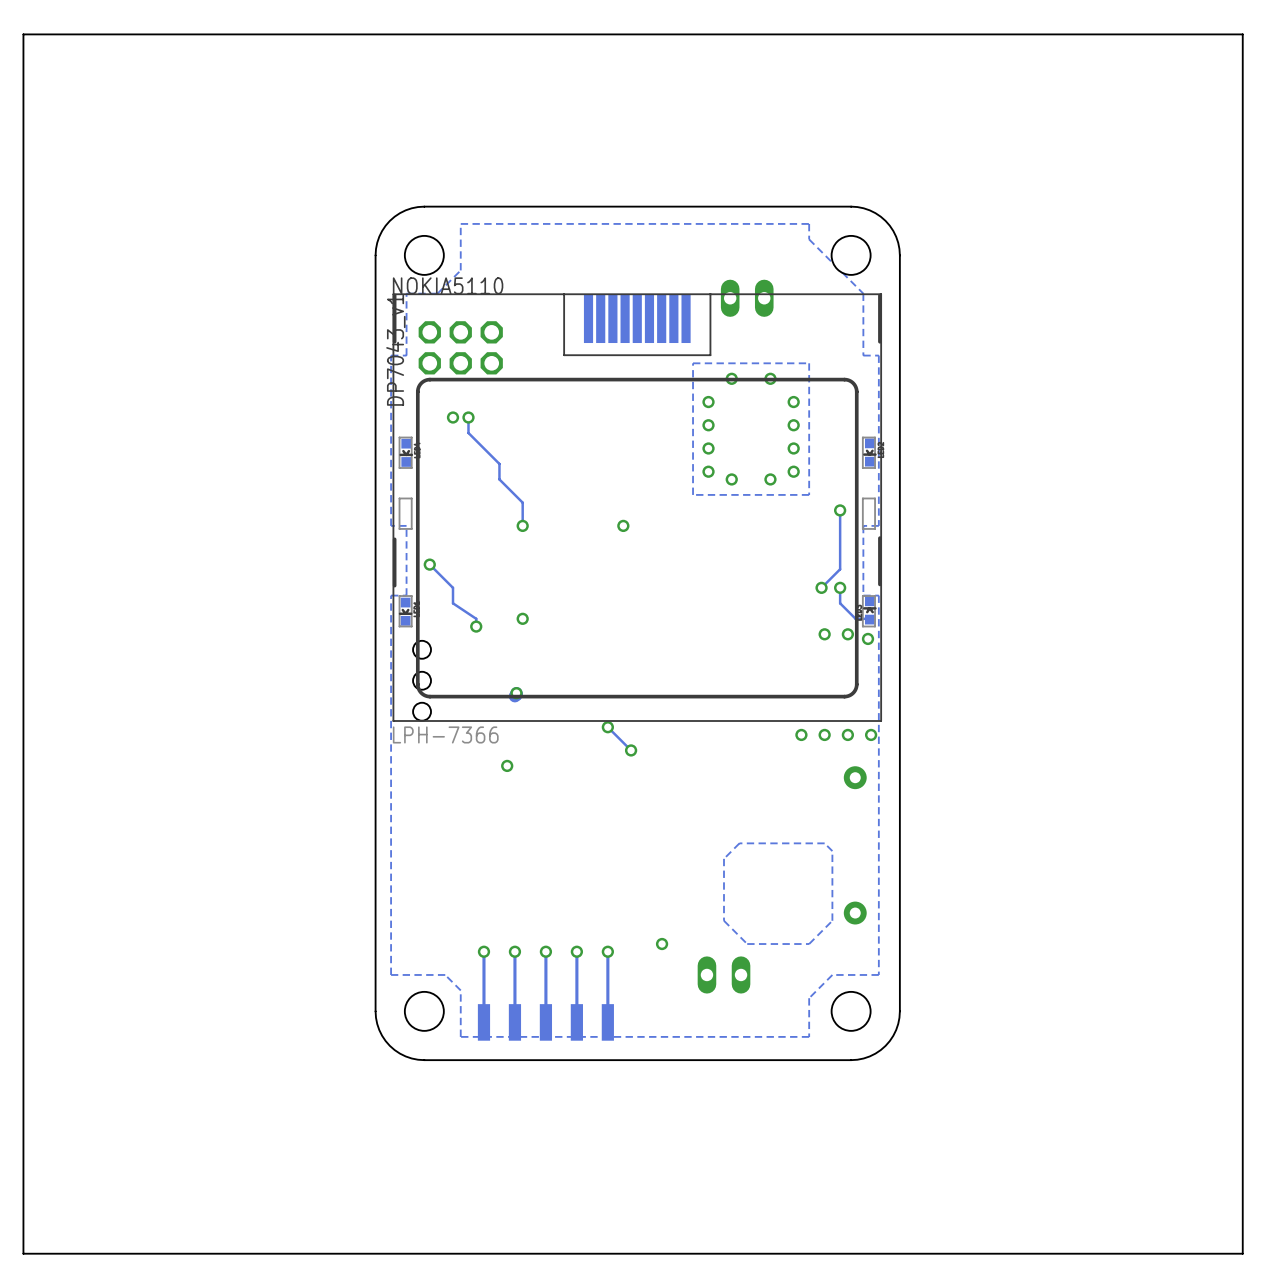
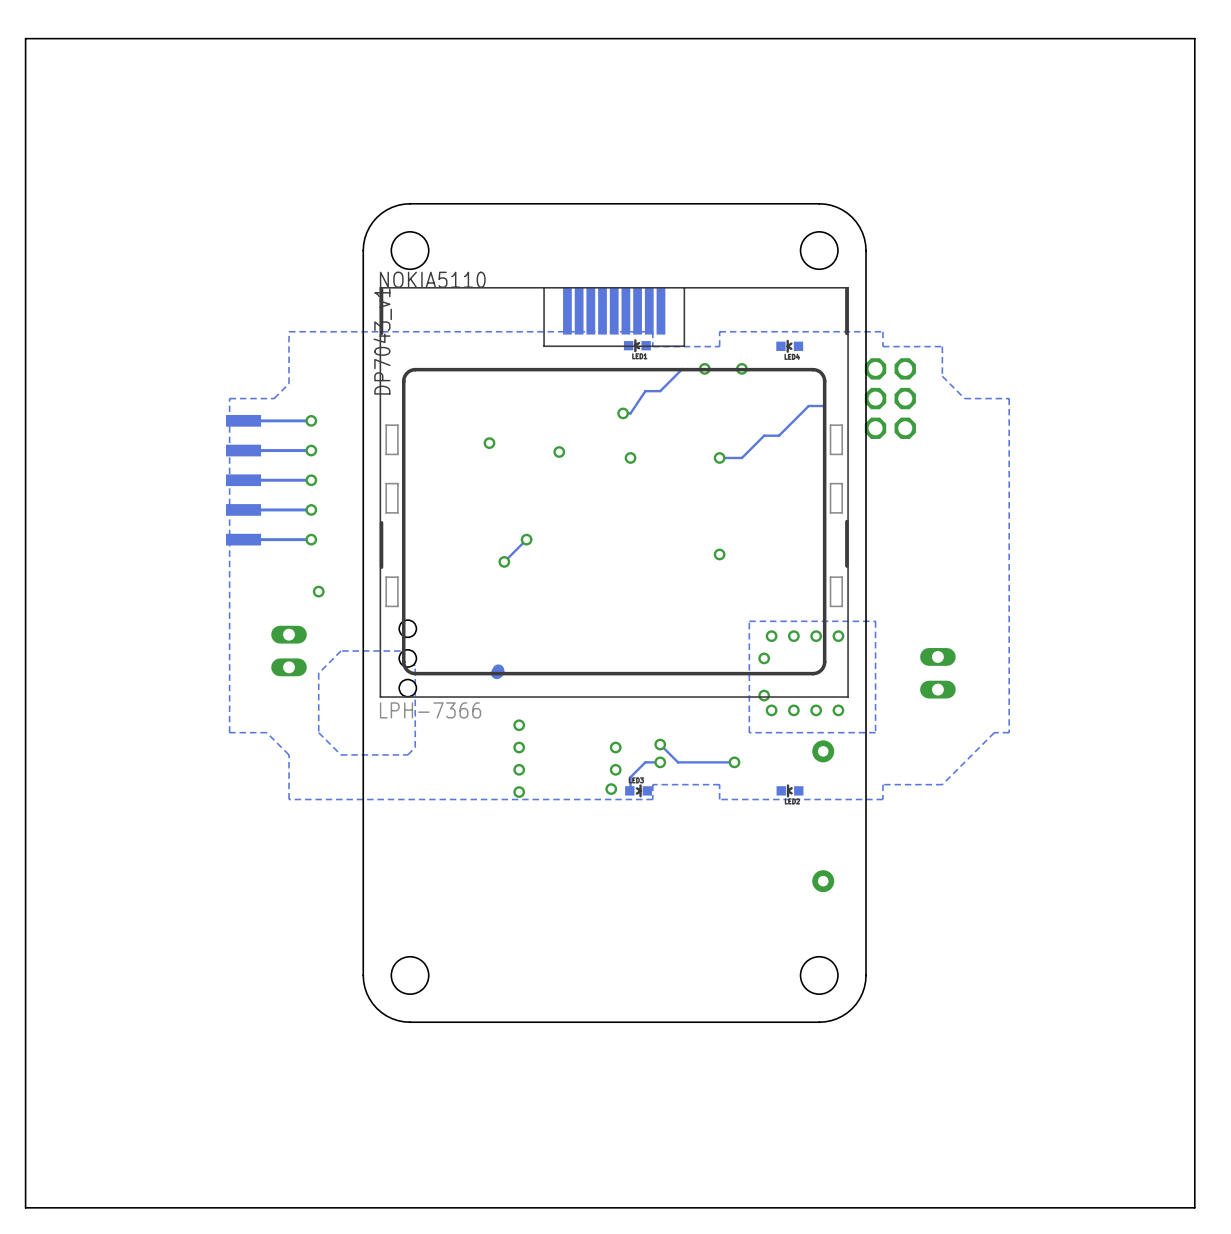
zone outline: (809, 223) (460, 223) (460, 270) (437, 293) (406, 293) (406, 355) (391, 355) (391, 525) (406, 525) (406, 595) (391, 595) (391, 974) (445, 974) (460, 990) (460, 1036) (809, 1036) (809, 998) (832, 974) (878, 974) (878, 595) (863, 595) (863, 525) (878, 525) (878, 355) (863, 355) (863, 293) (809, 239) (809, 223) -> none
part: (747, 298) -> none
zone outline: none -> (882, 331) (719, 331) (719, 346) (652, 346) (652, 331) (289, 331) (289, 383) (274, 398) (229, 398) (229, 732) (266, 732) (289, 754) (289, 799) (652, 799) (652, 784) (719, 784) (719, 799) (882, 799) (882, 784) (942, 784) (994, 732) (1009, 732) (1009, 398) (964, 398) (942, 376) (942, 346) (882, 346) (882, 331)
part: (460, 347) -> none
zone outline: (809, 363) (809, 494) (693, 494) (693, 363) (809, 363) -> none
track: none -> (682, 368) (660, 391) (645, 391) (630, 413) (623, 413)
via: (708, 402) -> none
via: (793, 402) -> none
part: none -> (890, 398)
via: (453, 417) -> none
track: (468, 417) (468, 432) (499, 463) (499, 479) (522, 502) (522, 525) -> none
via: (468, 417) -> none
track: none -> (823, 406) (808, 406) (779, 435) (764, 435) (741, 457) (719, 457)
via: none -> (623, 413)
via: (708, 425) -> none
via: (793, 425) -> none
track: none -> (311, 420) (243, 420)
via: none -> (311, 420)
via: (708, 448) -> none
via: (793, 448) -> none
part rotation: 0° (406, 452) -> 90° clockwise (789, 346)
part position: (406, 452) -> (789, 346)
part rotation: 0° (869, 452) -> 90° clockwise (790, 790)
part position: (869, 452) -> (790, 790)
via: none -> (489, 443)
track: none -> (311, 450) (243, 450)
via: none -> (311, 450)
via: none -> (559, 452)
via: none -> (630, 457)
via: (708, 471) -> none
via: none -> (719, 457)
via: (793, 471) -> none
via: (731, 479) -> none
via: (770, 479) -> none
part: none -> (243, 480)
track: none -> (311, 480) (243, 480)
via: none -> (311, 480)
track: (840, 510) (840, 569) (821, 587) -> none
via: (840, 510) -> none
track: none -> (311, 509) (243, 509)
via: none -> (311, 509)
via: (522, 525) -> none
via: (623, 525) -> none
track: none -> (311, 539) (243, 539)
via: none -> (311, 539)
track: none -> (526, 539) (504, 561)
via: none -> (526, 539)
track: (429, 564) (453, 587) (453, 603) (476, 618) (476, 626) -> none
via: (429, 564) -> none
via: none -> (719, 554)
via: none -> (504, 561)
via: (821, 587) -> none
track: (840, 587) (840, 603) (855, 618) (869, 619) -> none
via: (840, 587) -> none
part rotation: 0° (869, 610) -> 90° clockwise (638, 790)
part position: (869, 610) -> (638, 790)
via: none -> (318, 591)
part rotation: 0° (405, 611) -> 90° clockwise (637, 345)
part position: (405, 611) -> (637, 345)
via: (522, 618) -> none
via: (476, 626) -> none
via: (824, 634) -> none
via: (847, 634) -> none
via: (868, 638) -> none
zone outline: none -> (875, 621) (749, 621) (749, 732) (875, 732) (875, 621)
via: none -> (771, 636)
via: none -> (793, 636)
via: none -> (816, 636)
via: none -> (838, 636)
part: none -> (289, 651)
zone outline: none -> (400, 651) (415, 665) (415, 747) (407, 754) (340, 754) (318, 732) (318, 673) (340, 651) (400, 651)
via: none -> (764, 658)
via: (516, 693) -> none
part: none -> (937, 673)
via: none -> (764, 695)
track: (607, 727) (631, 750) -> none
via: (607, 727) -> none
via: none -> (519, 725)
via: (631, 750) -> none
via: (507, 765) -> none
track: none -> (660, 744) (678, 762) (734, 762)
via: none -> (660, 744)
via: none -> (519, 747)
via: none -> (615, 747)
track: none -> (660, 762) (645, 762) (630, 777) (629, 790)
via: none -> (660, 762)
via: none -> (734, 762)
via: none -> (519, 769)
via: none -> (615, 769)
via: none -> (611, 789)
via: none -> (519, 792)
zone outline: (824, 843) (832, 851) (832, 920) (809, 944) (747, 944) (724, 920) (724, 858) (739, 843) (824, 843) -> none
via: (662, 944) -> none
track: (483, 951) (483, 1022) -> none
via: (483, 951) -> none
track: (514, 951) (514, 1022) -> none
via: (514, 951) -> none
track: (545, 951) (545, 1022) -> none
via: (545, 951) -> none
track: (576, 951) (576, 1022) -> none
via: (576, 951) -> none
track: (607, 951) (607, 1022) -> none
via: (607, 951) -> none
part: (724, 974) -> none
part: (545, 1022) -> none

